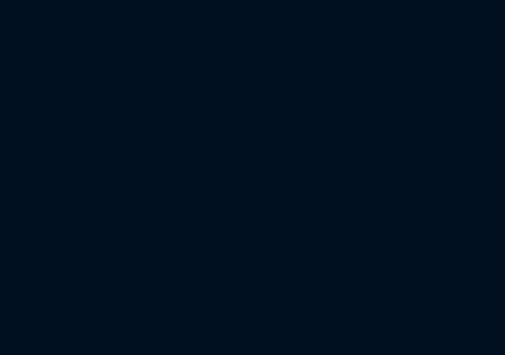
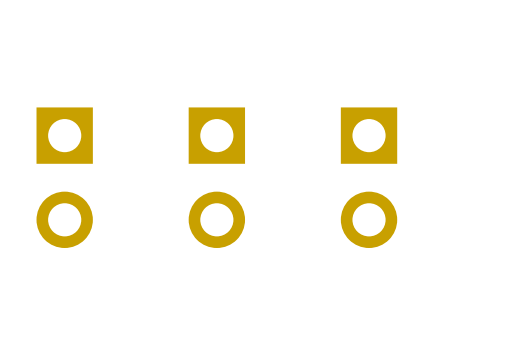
part: none -> (64, 177)
part: none -> (216, 177)
part: none -> (369, 177)

